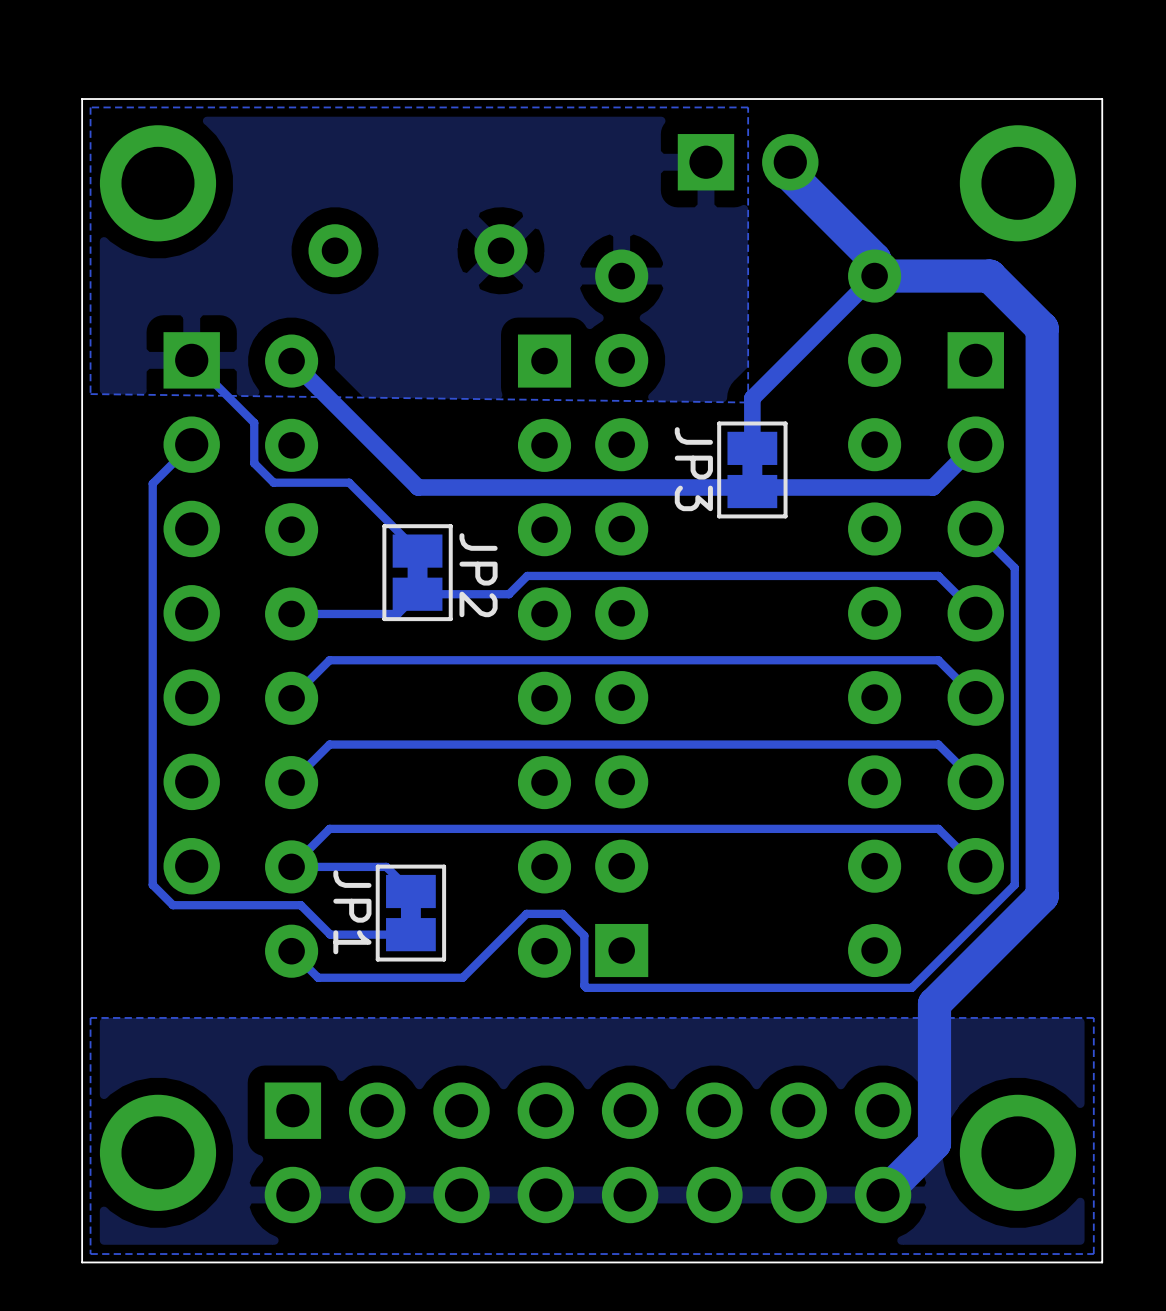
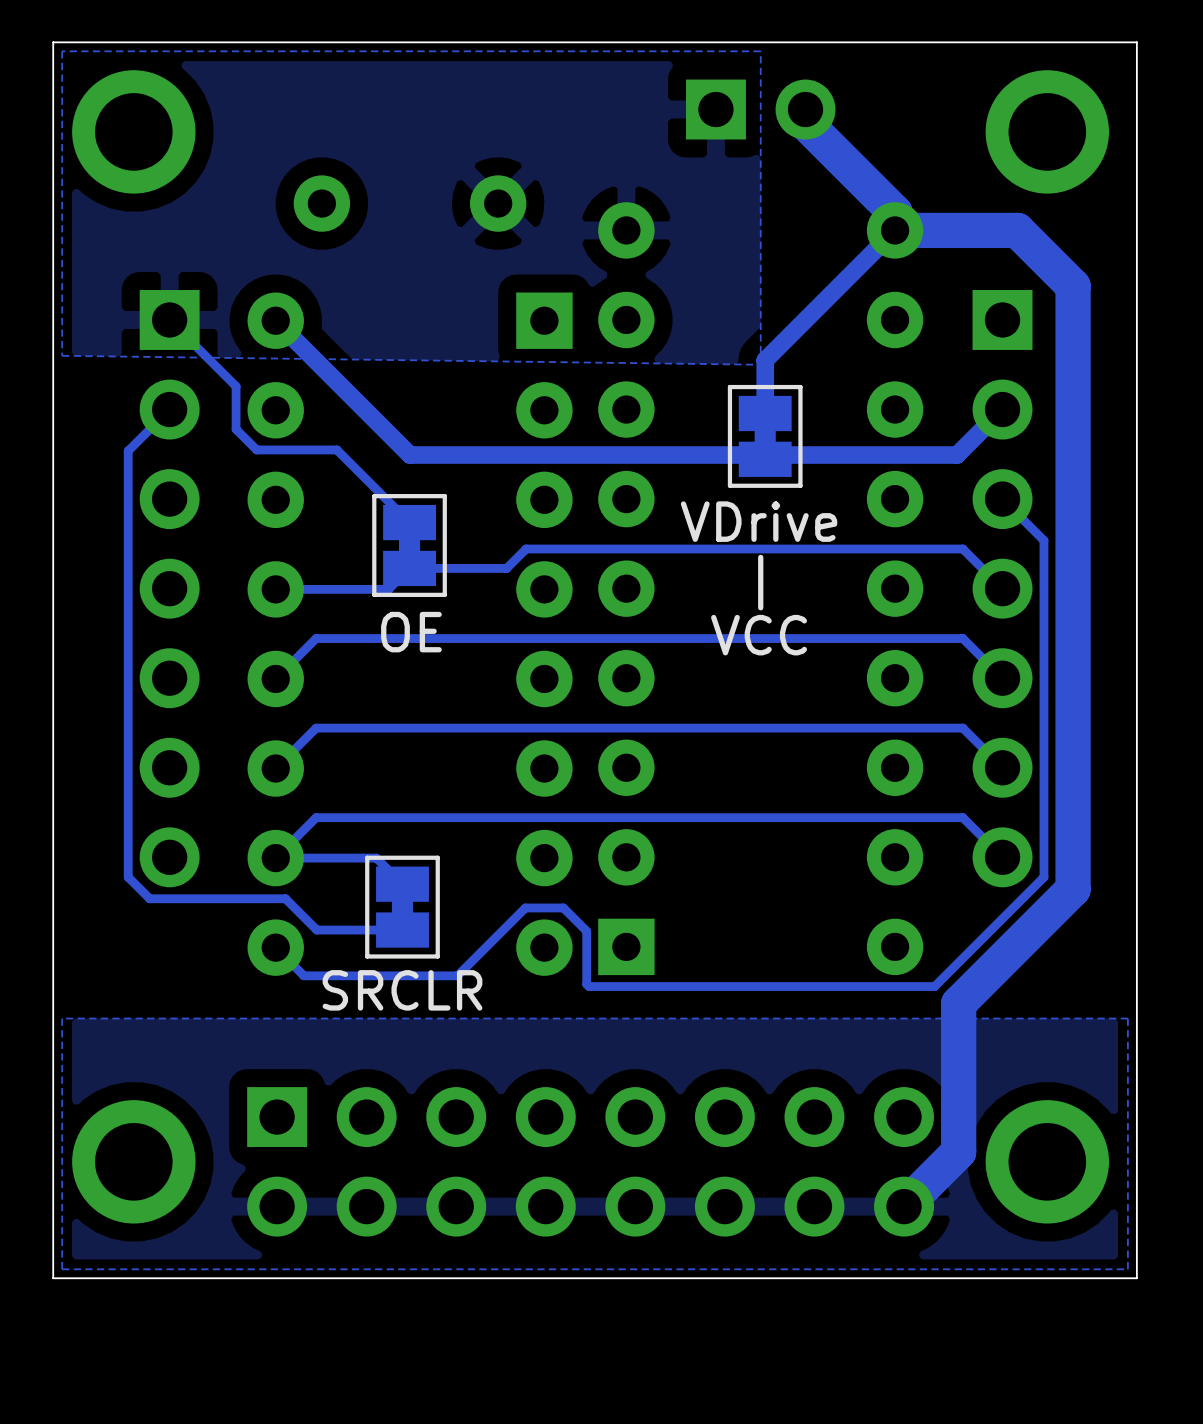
JP3 name: JP3 (693, 469) -> none
text: none -> VDrive (759, 521)
JP2 name: JP2 (478, 575) -> none
text: none -> | (760, 582)
text: none -> OE (411, 632)
text: none -> VCC (759, 635)
JP1 name: JP1 (352, 912) -> none
text: none -> SRCLR (402, 990)

